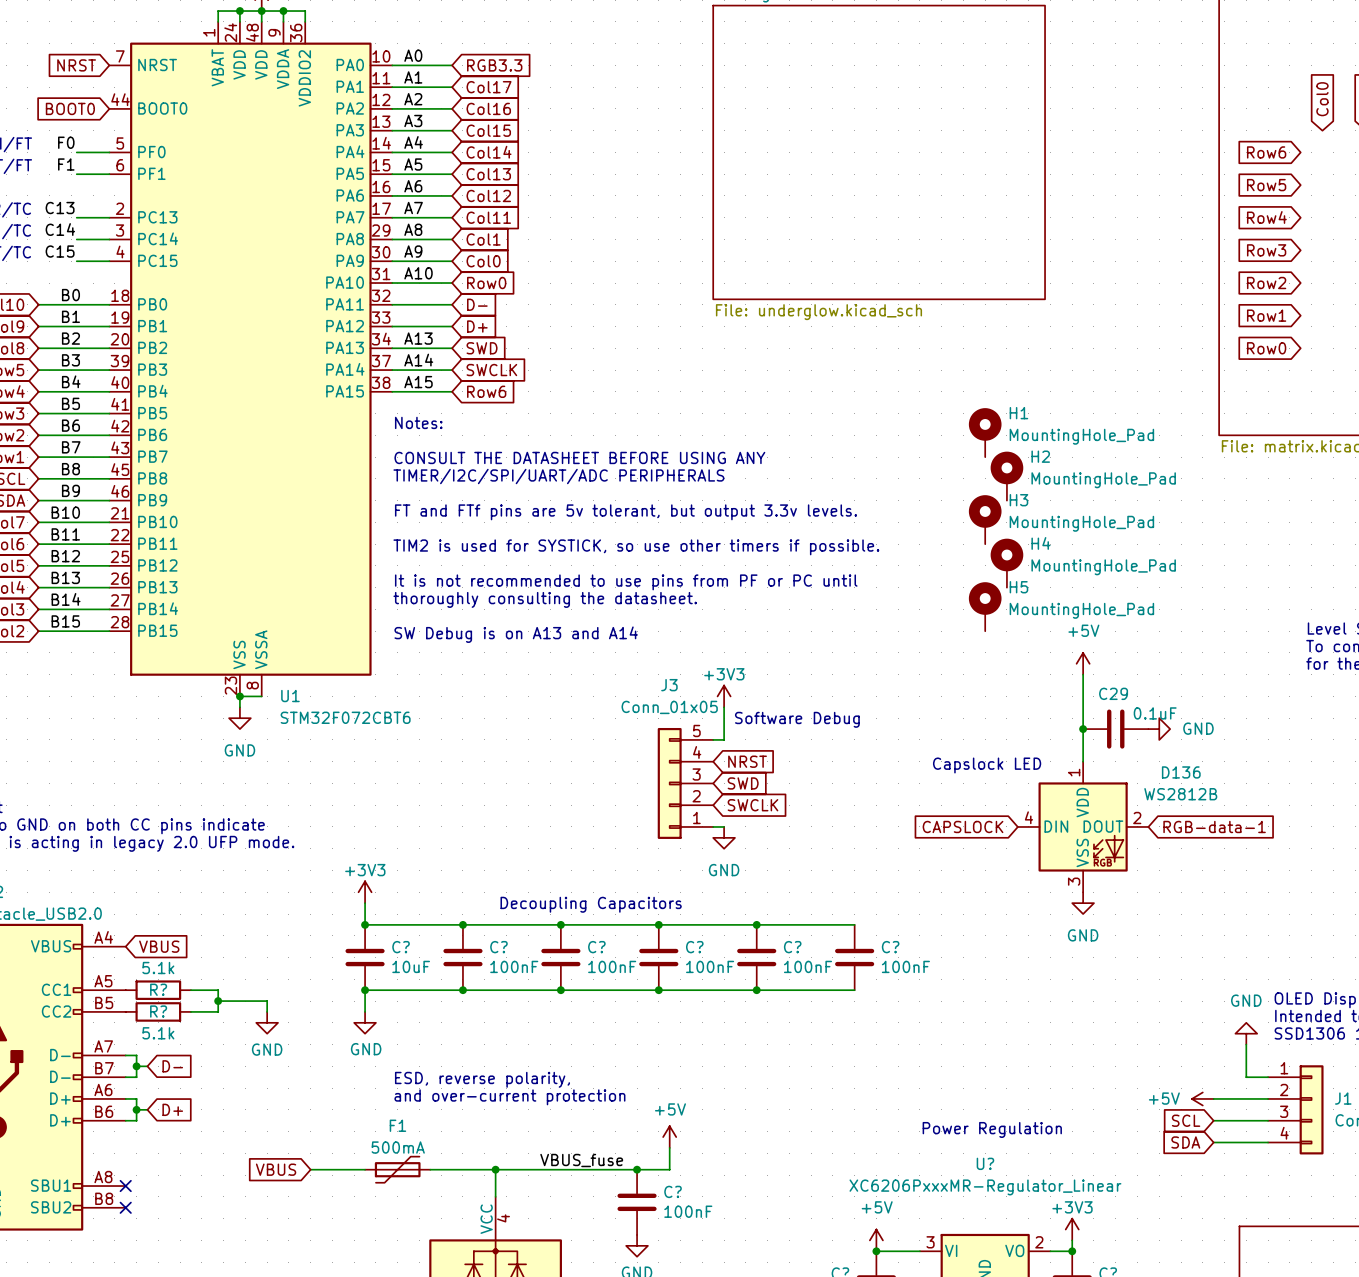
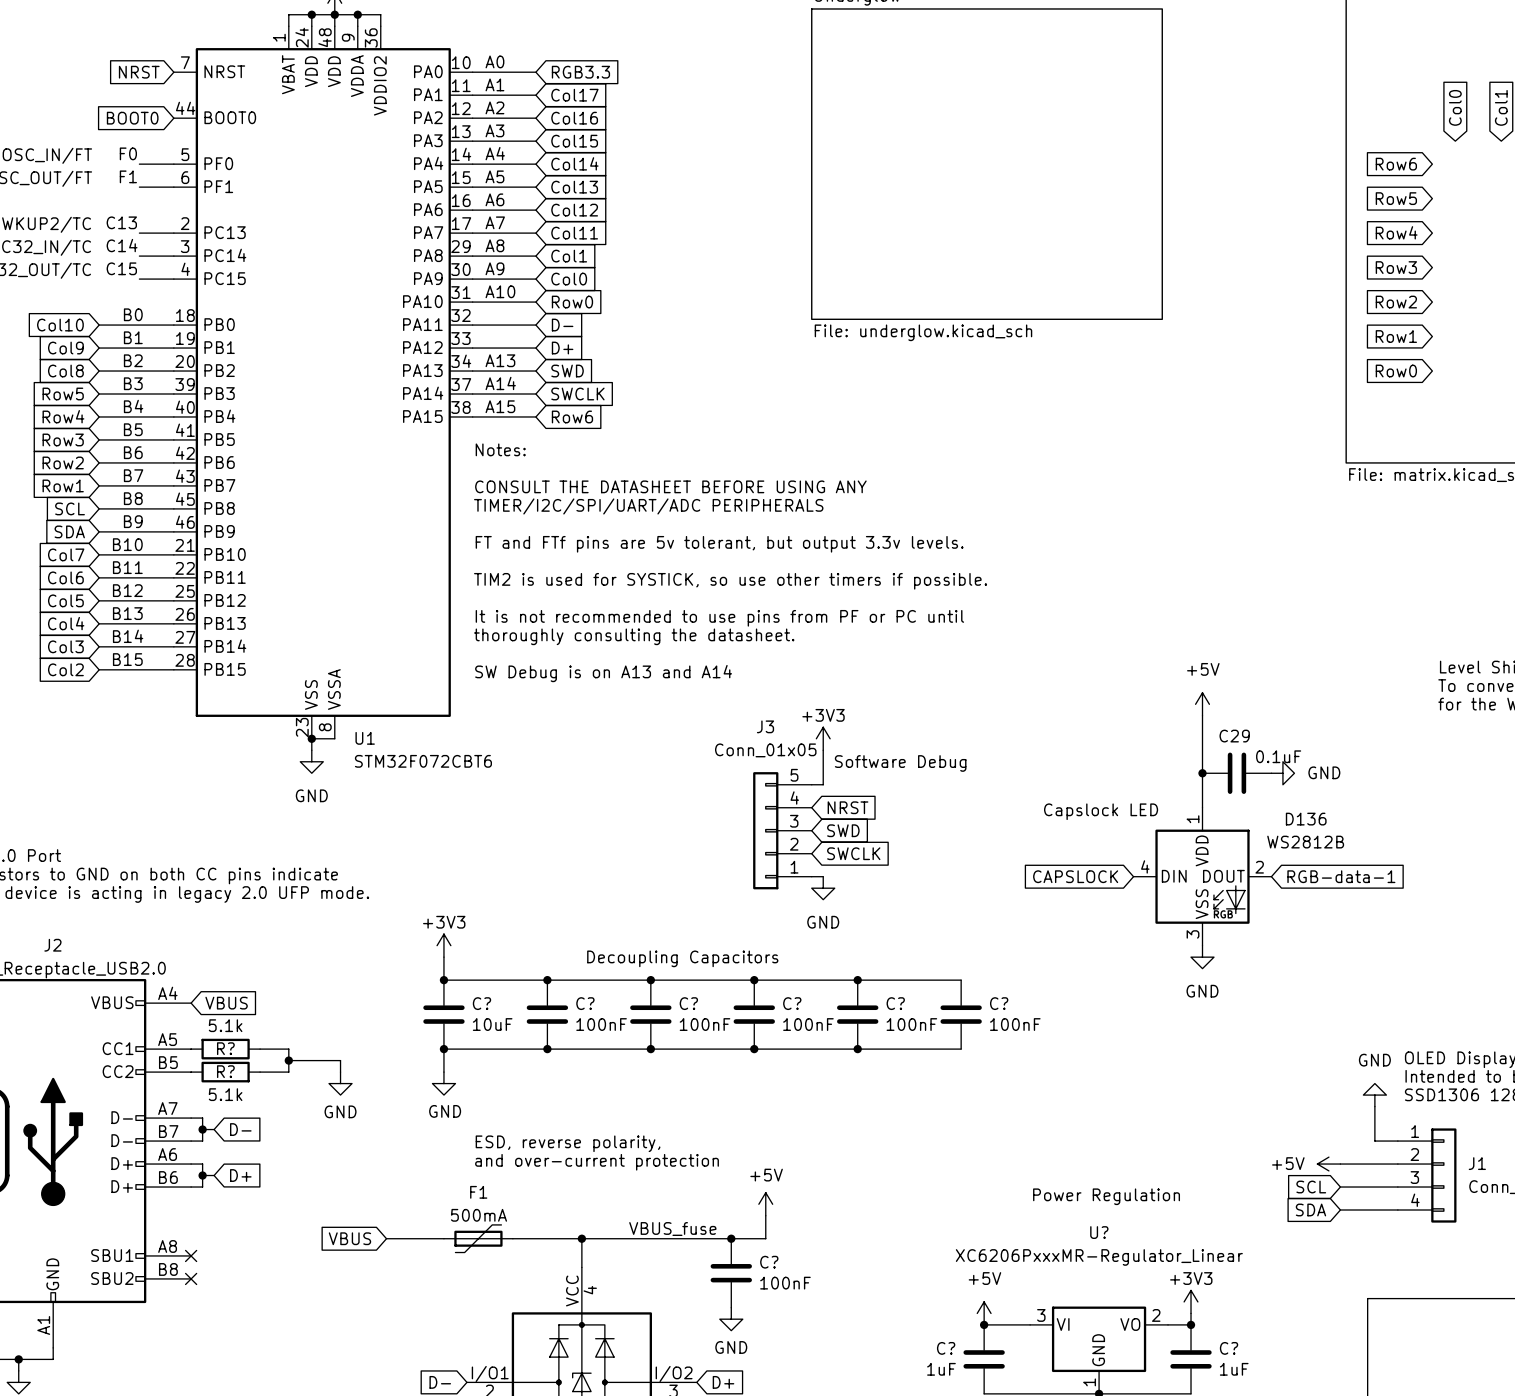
H1: MountingHole_Pad (985, 432) -> none
H2: MountingHole_Pad (1006, 476) -> none
H3: MountingHole_Pad (985, 519) -> none
H4: MountingHole_Pad (1006, 563) -> none
H5: MountingHole_Pad (985, 606) -> none

